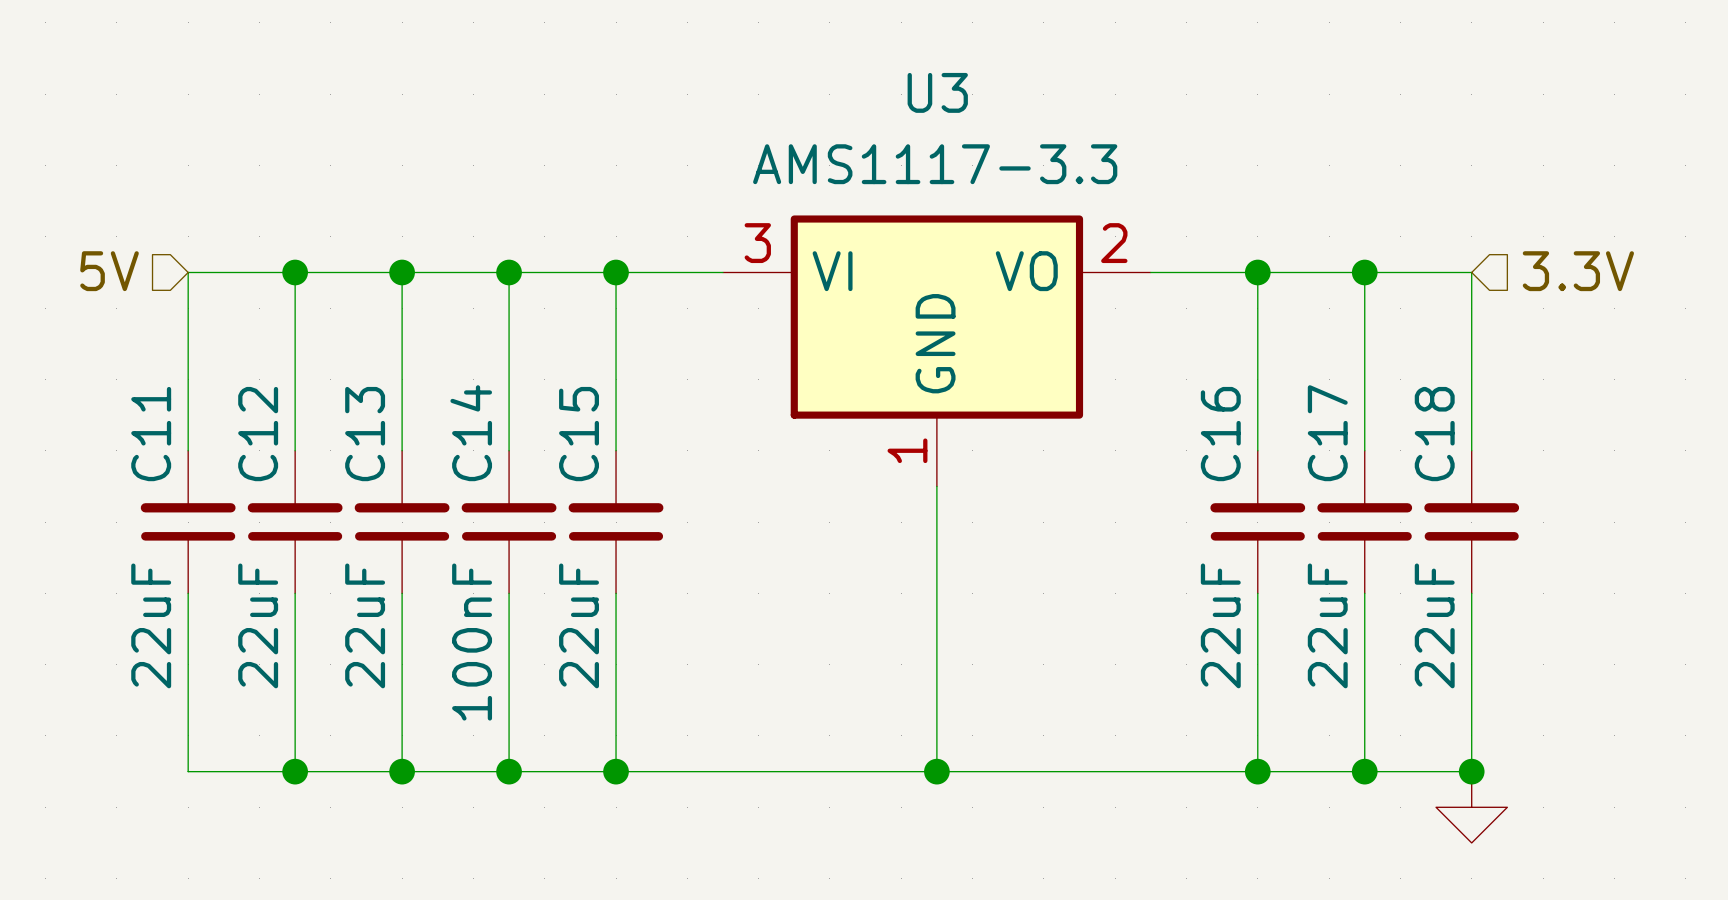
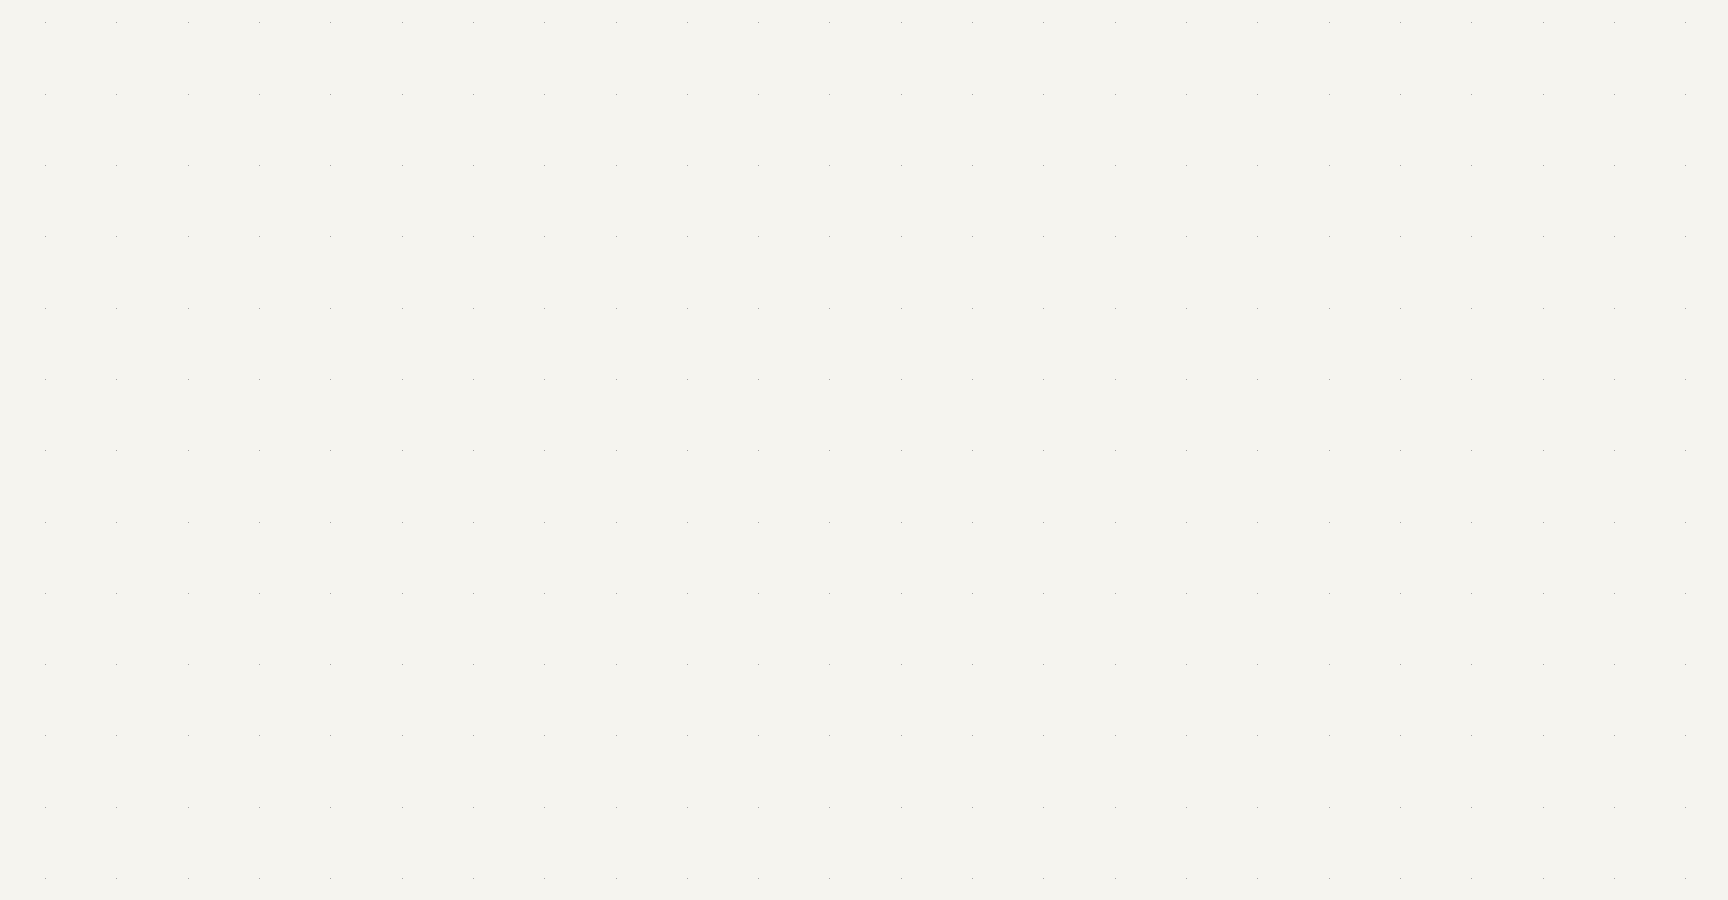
hierarchical label: 5V (109, 271) -> none
hierarchical label: 3.3V (1578, 271) -> none
wire: (295, 272) (295, 450) -> none
junction: (295, 272) -> none
wire: (402, 272) (402, 450) -> none
junction: (402, 272) -> none
wire: (509, 272) (509, 450) -> none
junction: (509, 272) -> none
wire: (616, 272) (616, 450) -> none
junction: (616, 272) -> none
wire: (722, 272) (188, 272) (188, 450) -> none
wire: (1150, 272) (1471, 272) (1471, 450) -> none
wire: (1257, 272) (1257, 450) -> none
junction: (1257, 272) -> none
wire: (1364, 272) (1364, 450) -> none
junction: (1364, 272) -> none
U3: AMS1117-3.3 (936, 350) -> none
wire: (936, 486) (936, 771) -> none
C11: 22uF (188, 522) -> none
C12: 22uF (295, 522) -> none
C13: 22uF (402, 522) -> none
C14: 100nF (509, 522) -> none
C15: 22uF (616, 522) -> none
C16: 22uF (1257, 522) -> none
C17: 22uF (1364, 522) -> none
C18: 22uF (1471, 522) -> none
wire: (188, 593) (188, 771) (1471, 771) (1471, 593) -> none
wire: (295, 593) (295, 771) -> none
wire: (402, 593) (402, 771) -> none
wire: (509, 593) (509, 771) -> none
wire: (616, 593) (616, 771) -> none
wire: (1257, 593) (1257, 771) -> none
wire: (1364, 593) (1364, 771) -> none
junction: (295, 771) -> none
junction: (402, 771) -> none
junction: (509, 771) -> none
junction: (616, 771) -> none
junction: (936, 771) -> none
junction: (1257, 771) -> none
junction: (1364, 771) -> none
junction: (1471, 771) -> none
power symbol: (1471, 807) -> none

